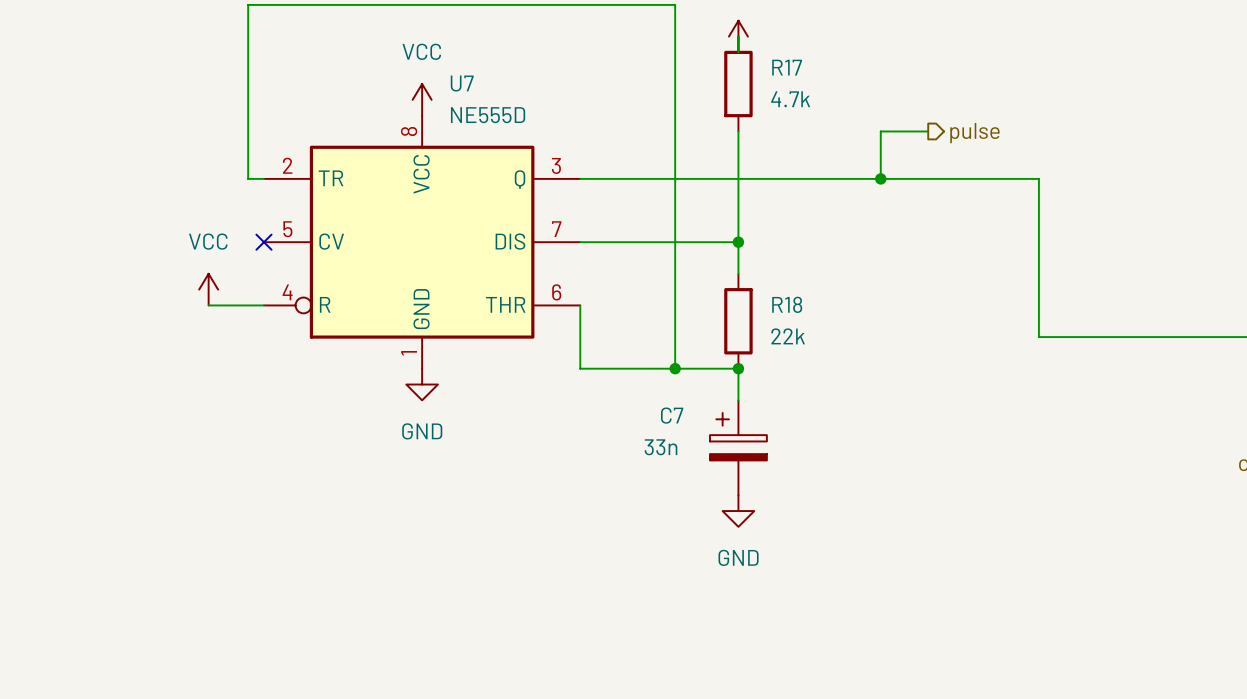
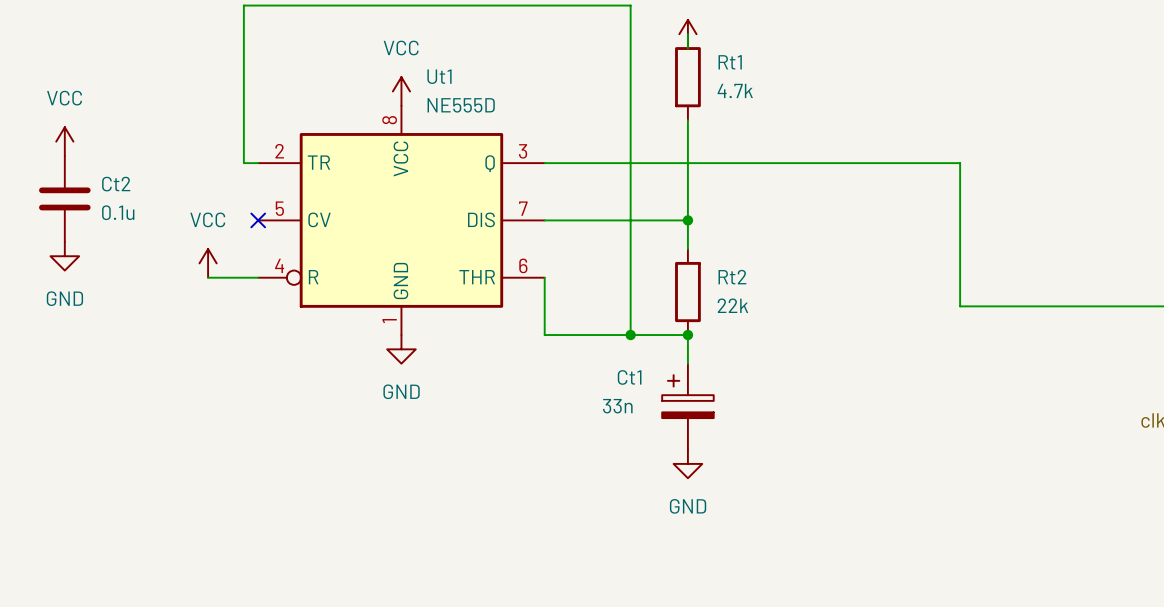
R17 name: R17 (787, 67) -> Rt1 (730, 62)
U7 name: U7 (462, 83) -> Ut1 (439, 76)
wire: (928, 131) (880, 131) (880, 178) -> none
hierarchical label: pulse (974, 133) -> none
power symbol: none -> VCC (64, 141)
junction: (880, 178) -> none
Ct2: none -> 0.1u (64, 198)
power symbol: none -> GND (64, 256)
R18 name: R18 (787, 304) -> Rt2 (732, 277)
C7 name: C7 (672, 415) -> Ct1 (629, 377)

